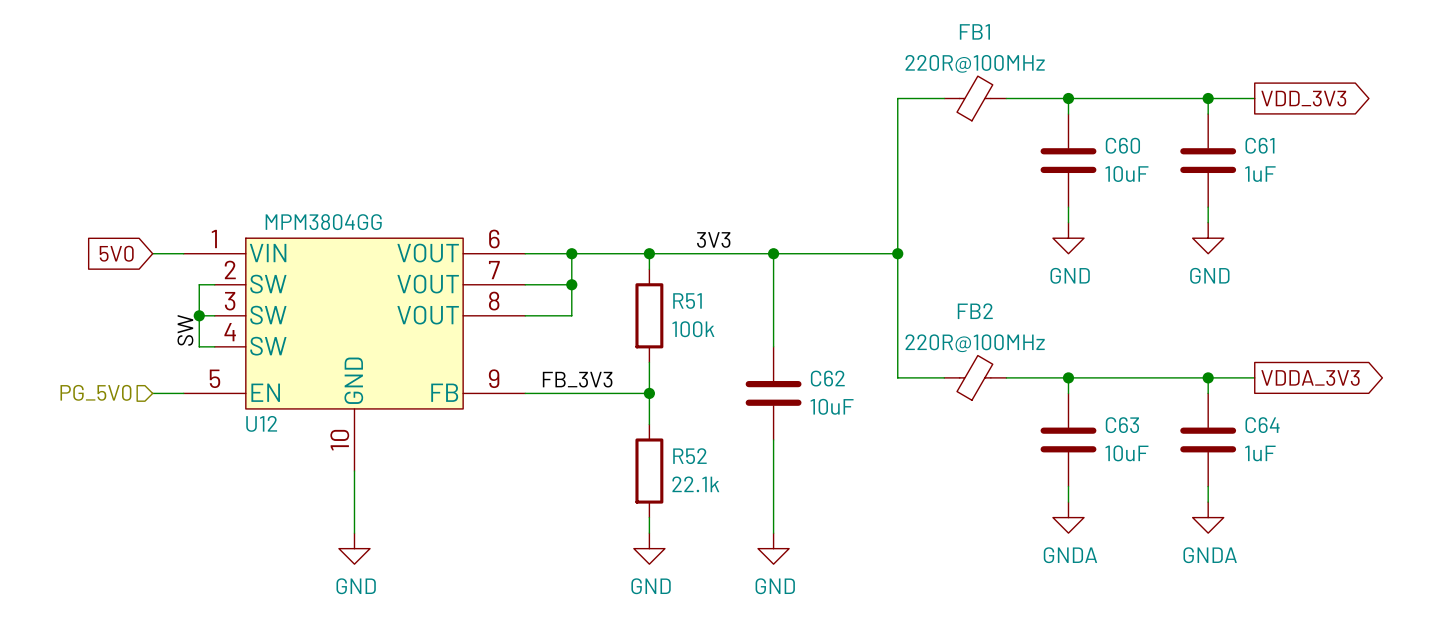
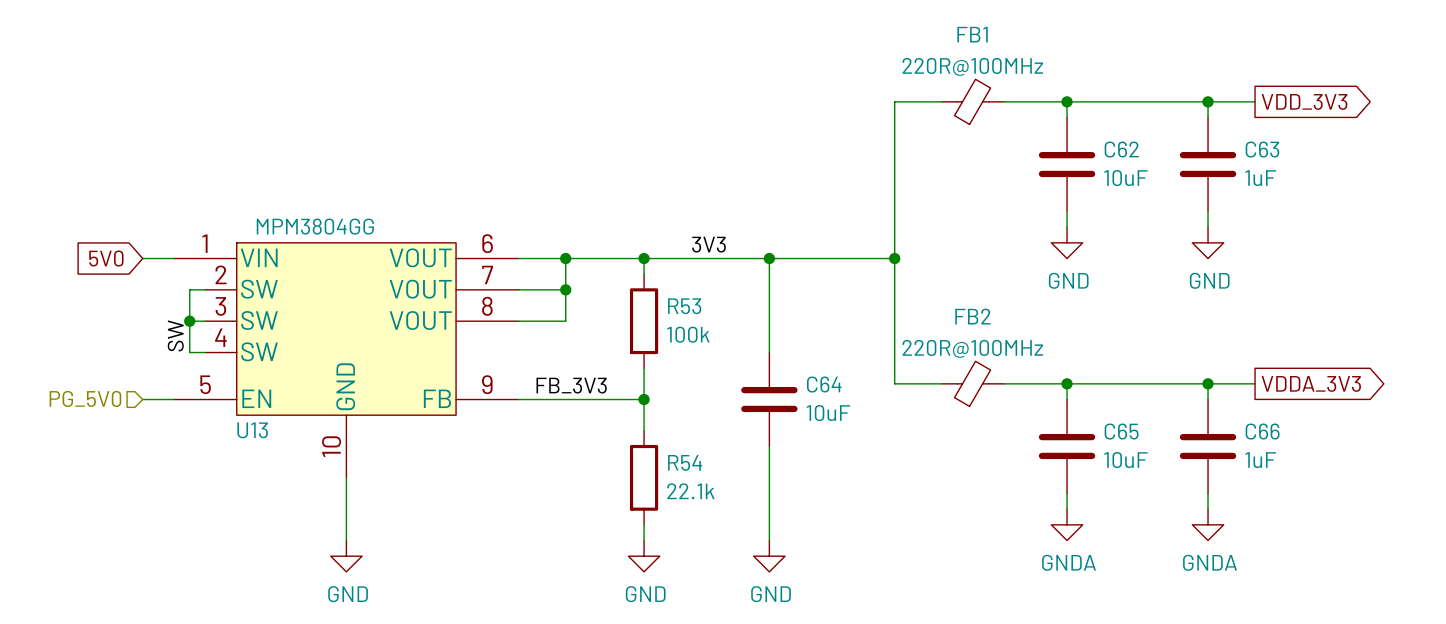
C60 name: C60 (1122, 145) -> C62 (1121, 149)
C61 name: C61 (1259, 145) -> C63 (1262, 149)
R51 name: R51 (687, 301) -> R53 (684, 306)
C62 name: C62 (827, 378) -> C64 (824, 384)
U12 name: U12 (261, 423) -> U13 (252, 430)
C63 name: C63 (1122, 425) -> C65 (1121, 431)
C64 name: C64 (1262, 425) -> C66 (1262, 431)
R52 name: R52 (689, 456) -> R54 (685, 462)

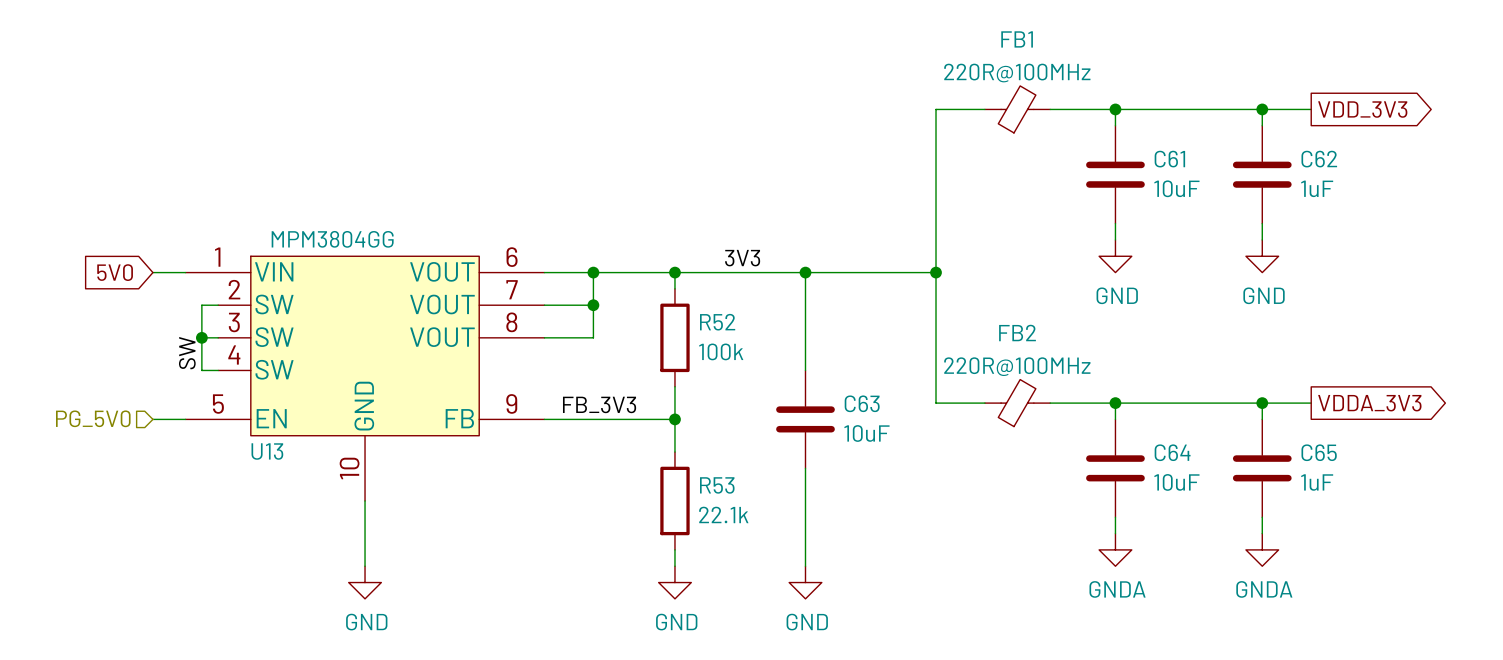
C62 name: C62 (1121, 149) -> C61 (1169, 159)
C63 name: C63 (1262, 149) -> C62 (1319, 159)
R53 name: R53 (684, 306) -> R52 (717, 322)
C64 name: C64 (824, 384) -> C63 (862, 403)
C65 name: C65 (1121, 431) -> C64 (1172, 452)
C66 name: C66 (1262, 431) -> C65 (1319, 452)
R54 name: R54 (685, 462) -> R53 (717, 485)

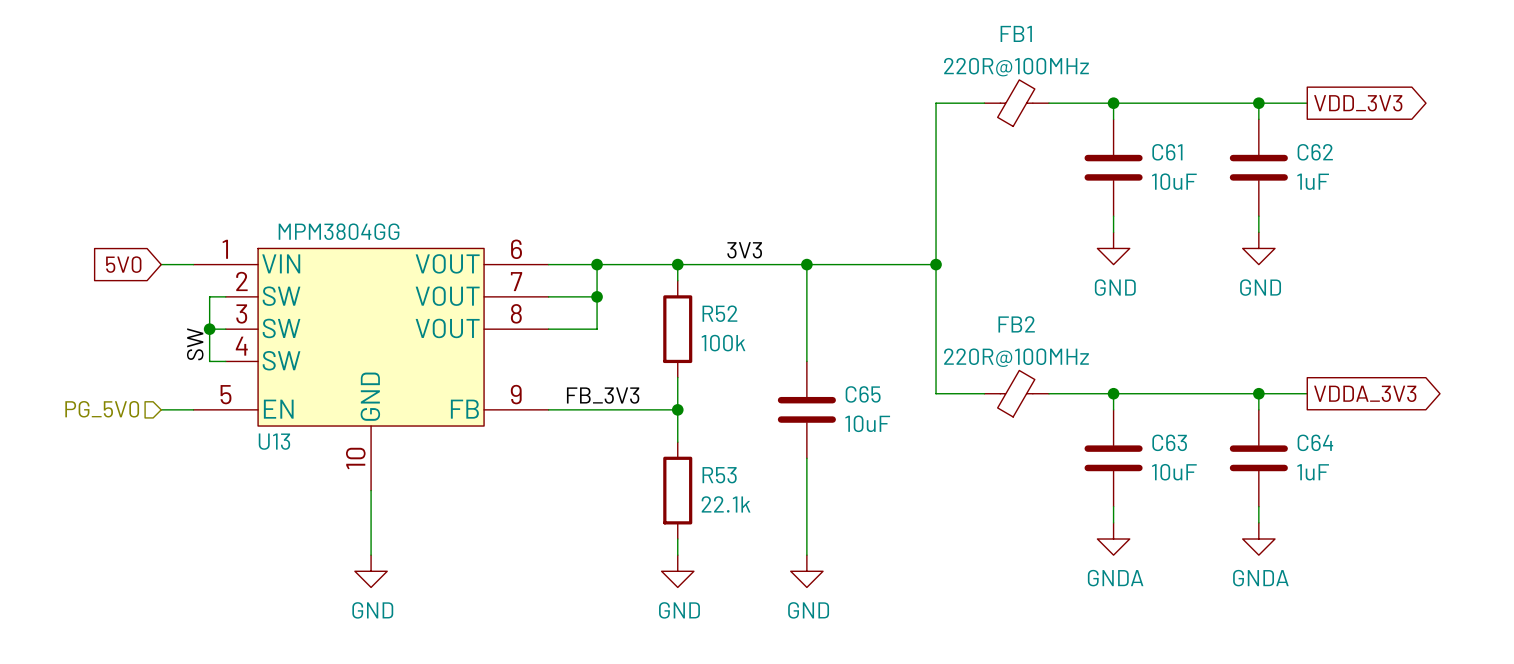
C63 name: C63 (862, 403) -> C65 (863, 394)
C64 name: C64 (1172, 452) -> C63 (1169, 442)
C65 name: C65 (1319, 452) -> C64 (1315, 442)

